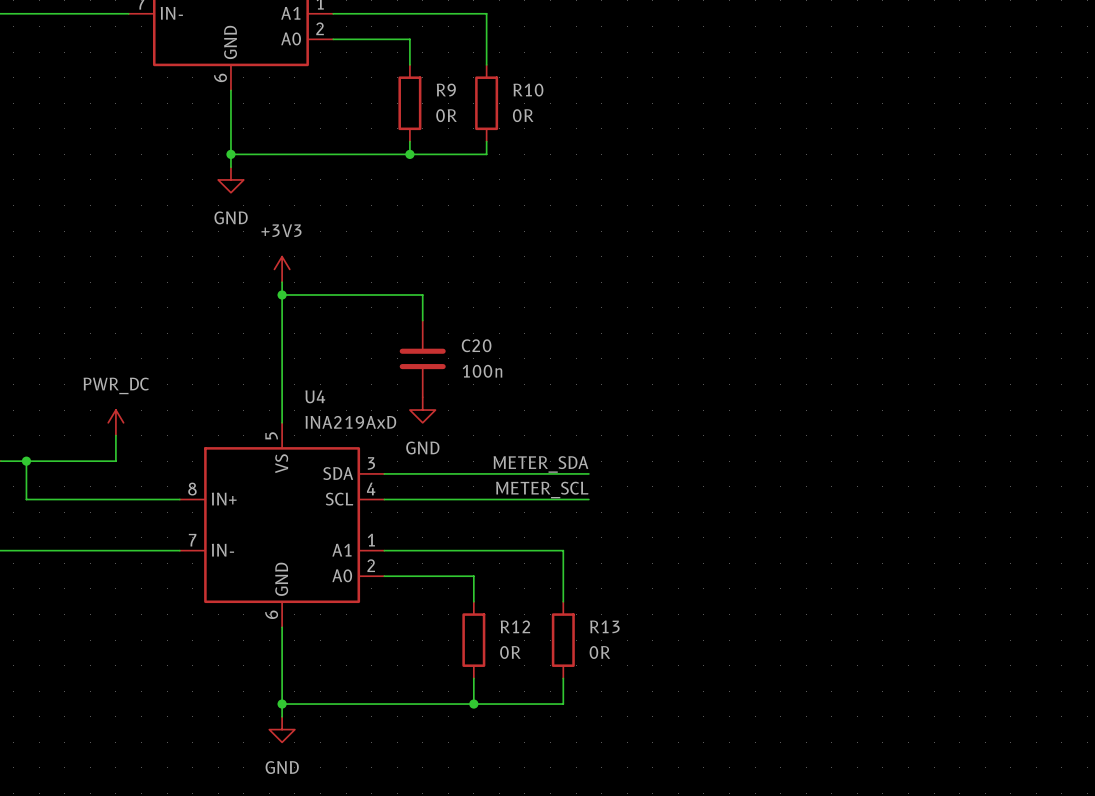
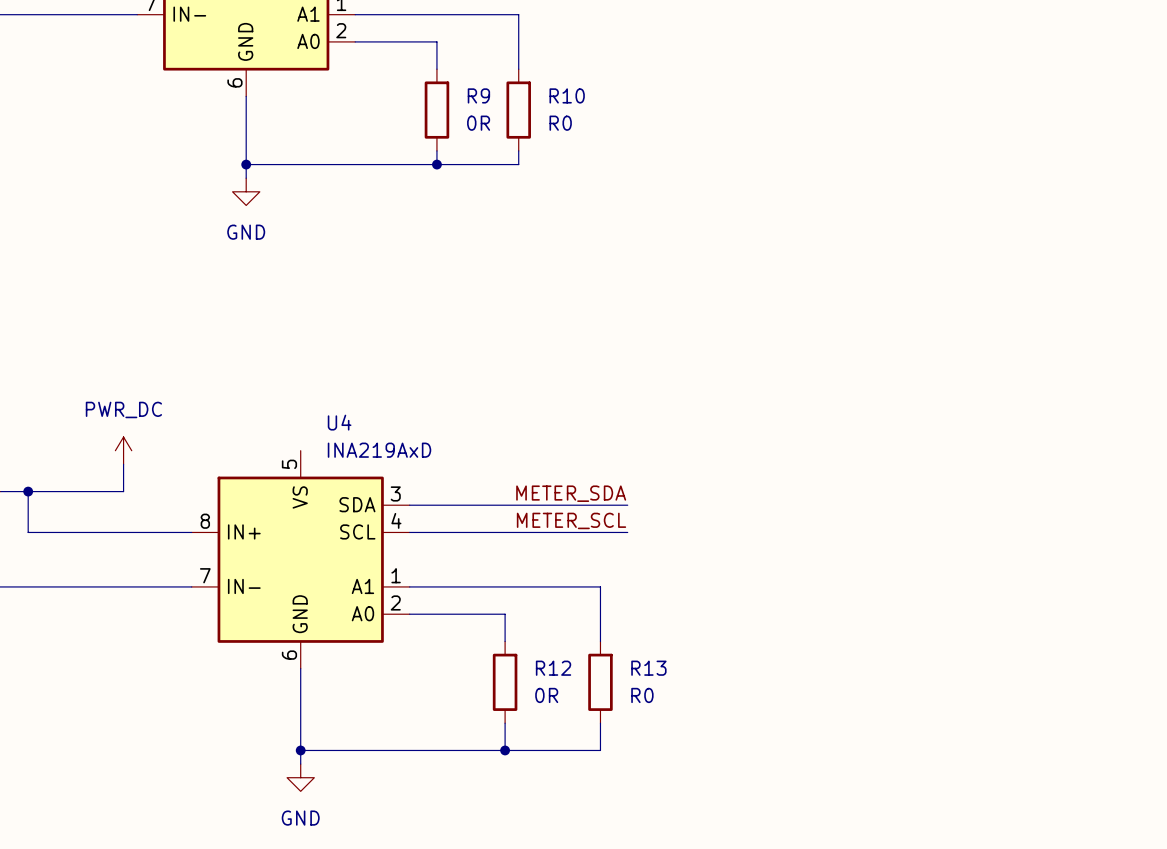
R10 value: 0R (523, 115) -> R0 (560, 123)
power symbol: +3V3 (282, 269) -> none
wire: (282, 282) (282, 422) -> none
wire: (282, 294) (422, 294) (422, 320) -> none
junction: (282, 294) -> none
C20: 100n (422, 358) -> none
power symbol: GND (422, 410) -> none
R13 value: 0R (599, 652) -> R0 (642, 695)

